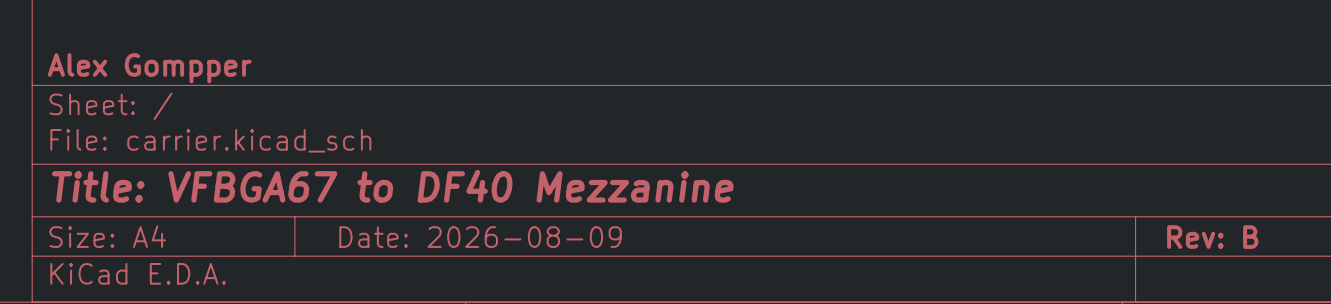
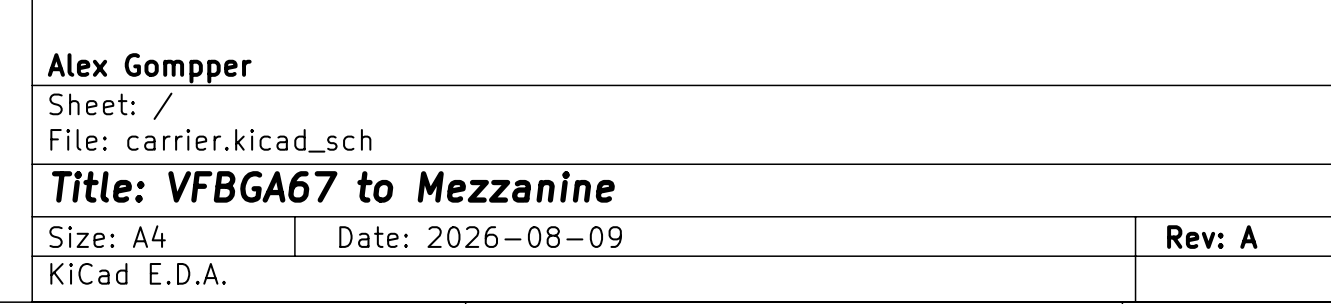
title block: Title: VFBGA67 to DF40 Mezzanine (392, 186) -> Title: VFBGA67 to Mezzanine (333, 186)
title block: Rev: B (1212, 237) -> Rev: A (1212, 237)

